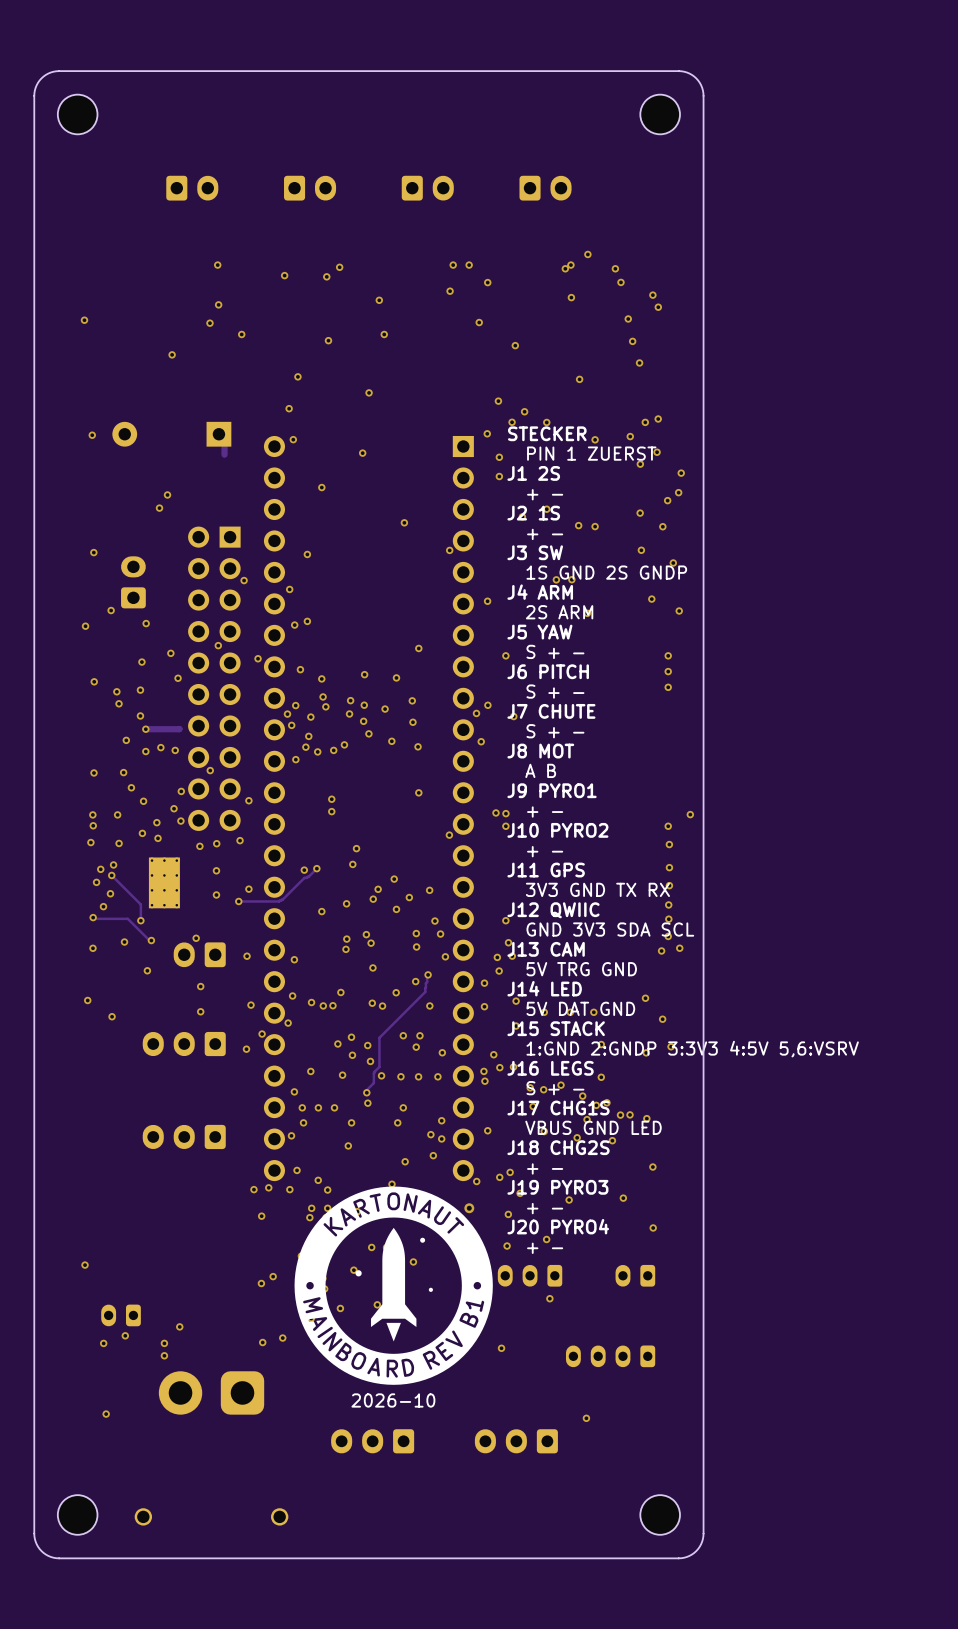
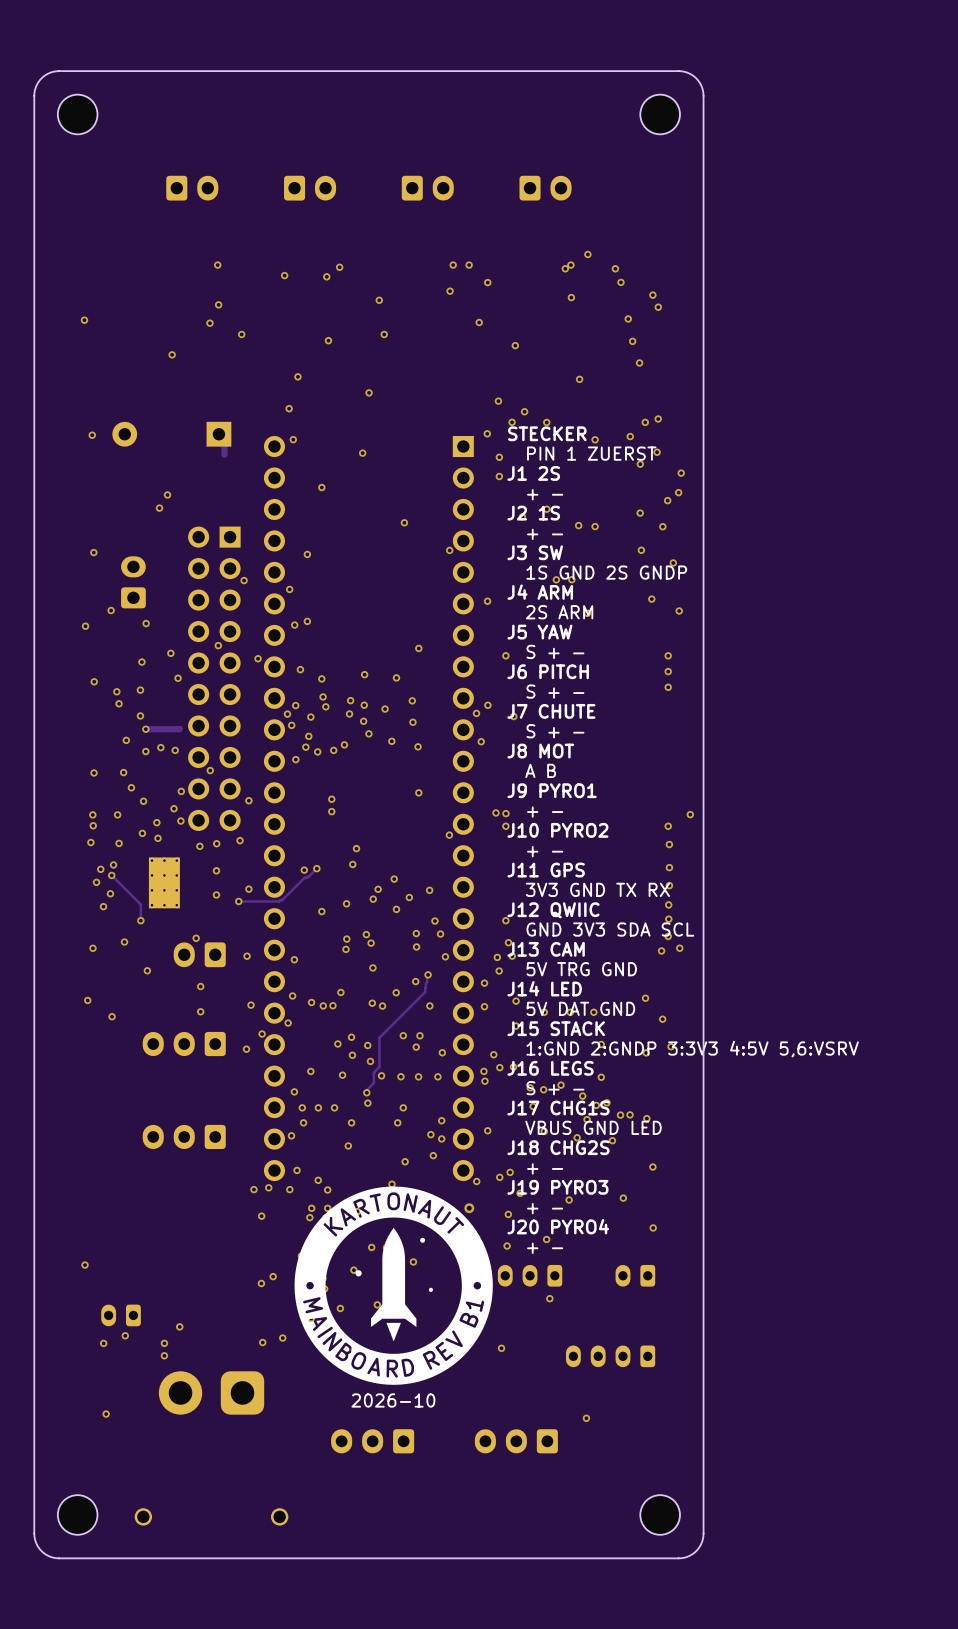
track: (93, 917) (127, 918) (151, 940) -> none
via: (93, 917) -> none
via: (151, 940) -> none

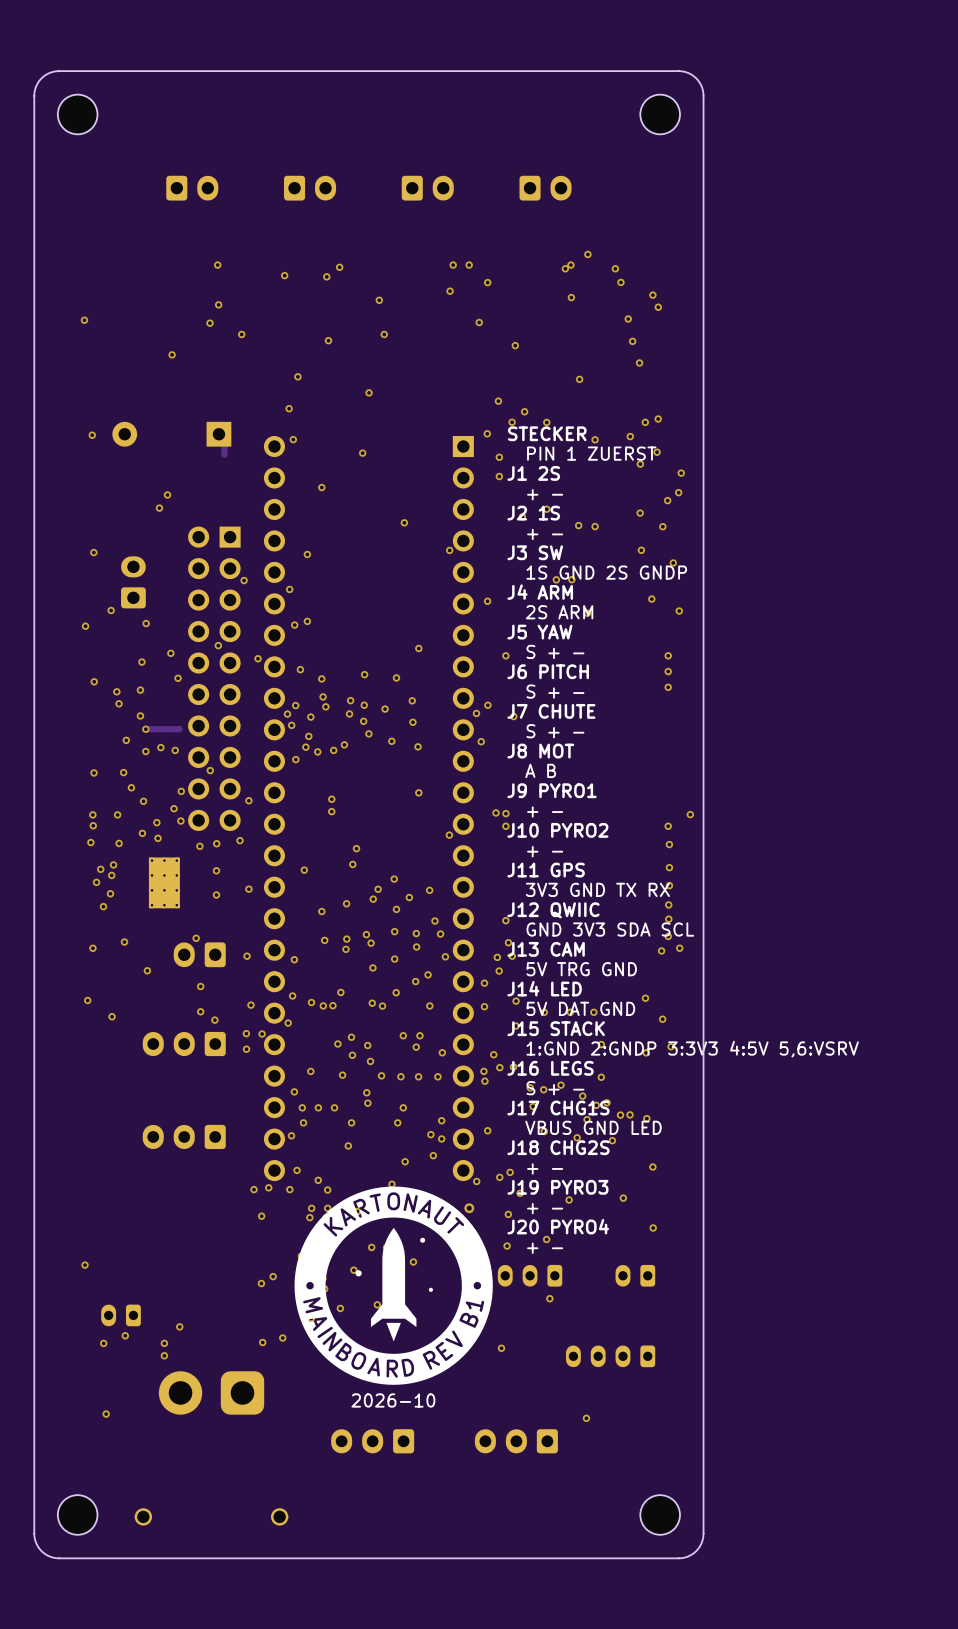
track: (316, 868) (279, 901) (238, 901) -> none
via: (316, 868) -> none
track: (111, 875) (140, 904) (140, 920) -> none
via: (238, 901) -> none
via: (140, 920) -> none
via: none -> (394, 931)
via: none -> (324, 940)
via: none -> (394, 959)
track: (427, 978) (425, 991) (379, 1037) (379, 1066) (373, 1073) (373, 1083) (367, 1089) -> none
via: none -> (214, 1020)
via: none -> (246, 1033)

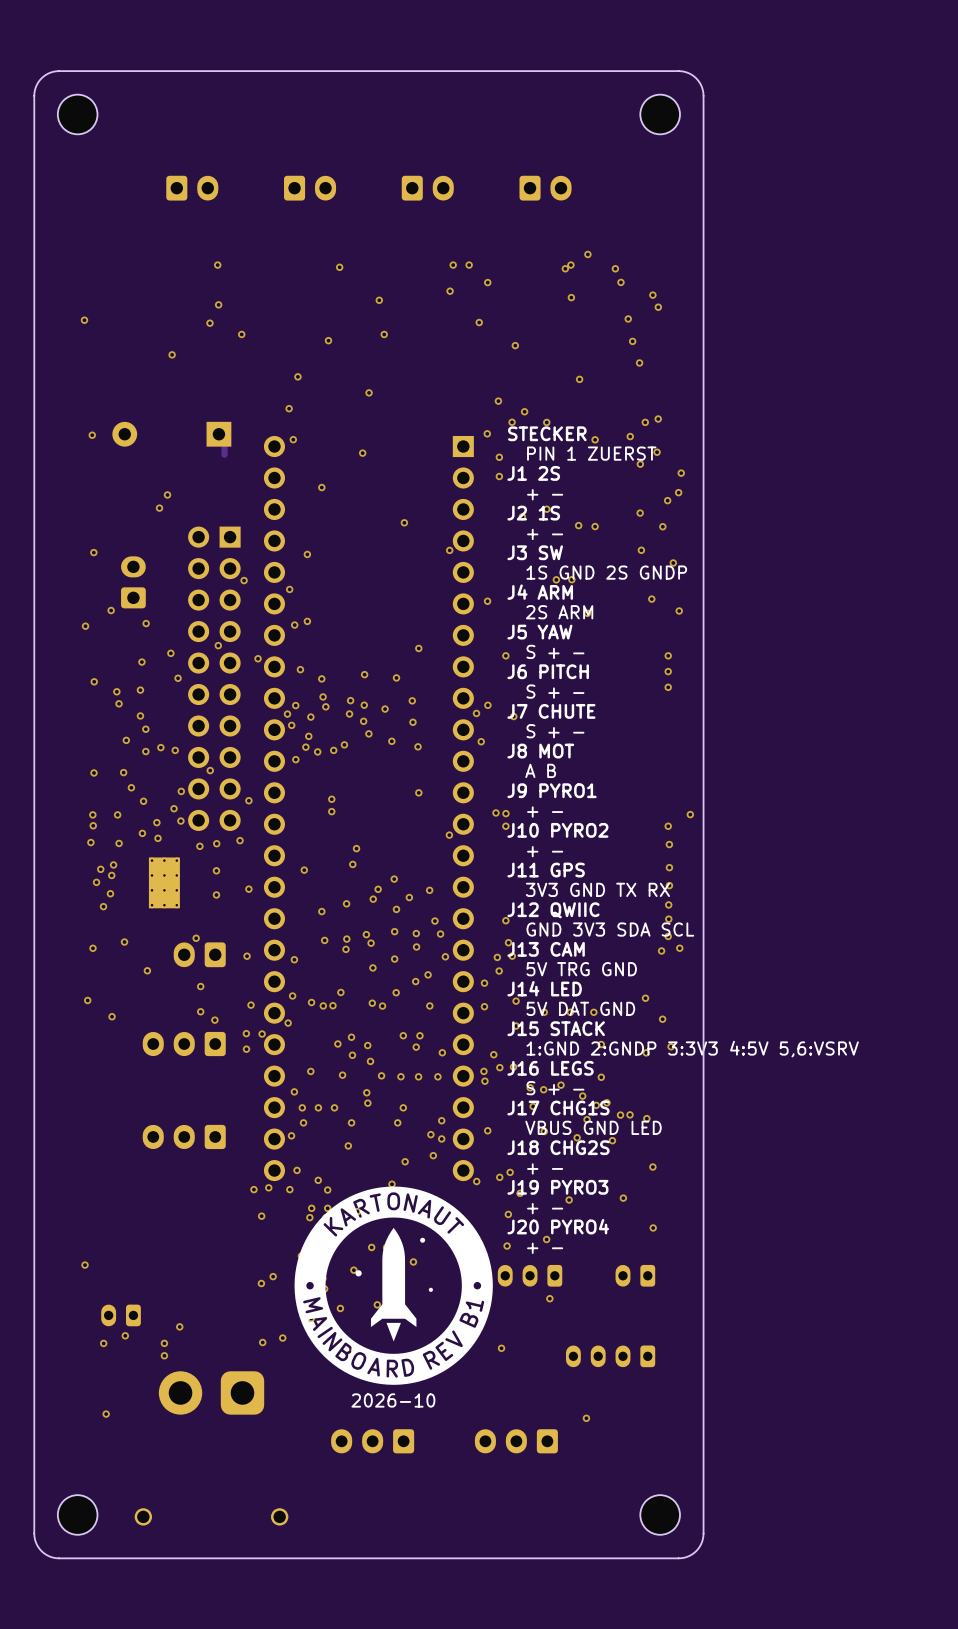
via: (284, 275) -> none
via: (326, 276) -> none
track: (179, 728) (145, 729) -> none
via: (469, 1208) -> none

